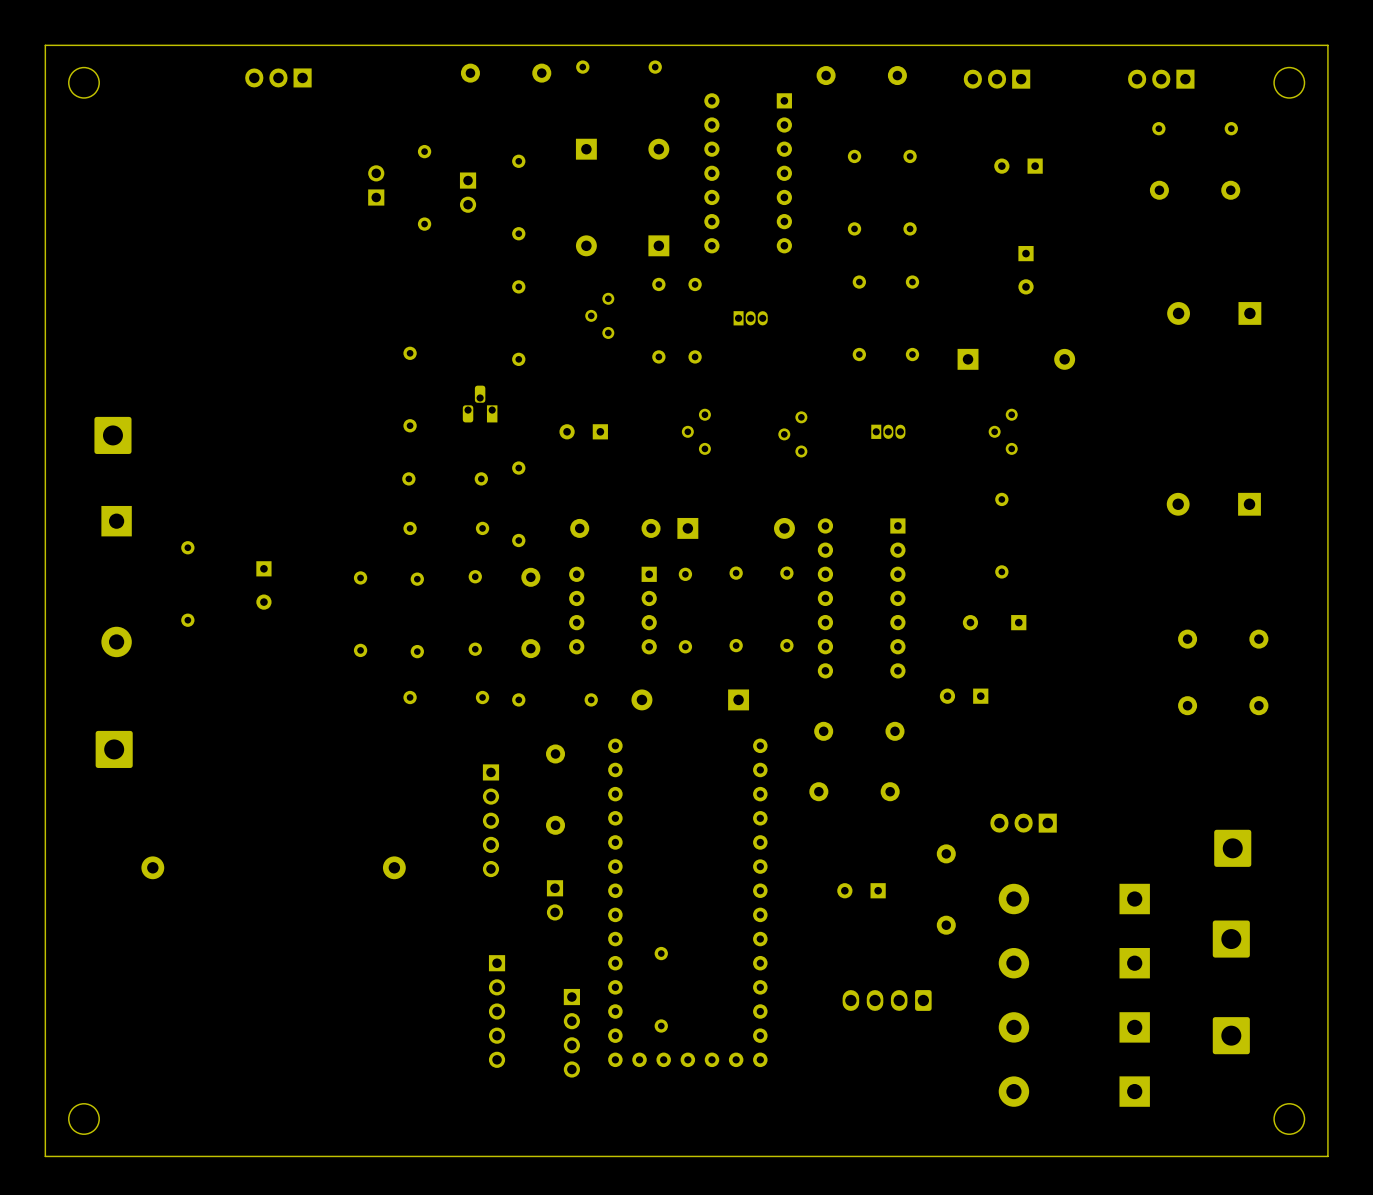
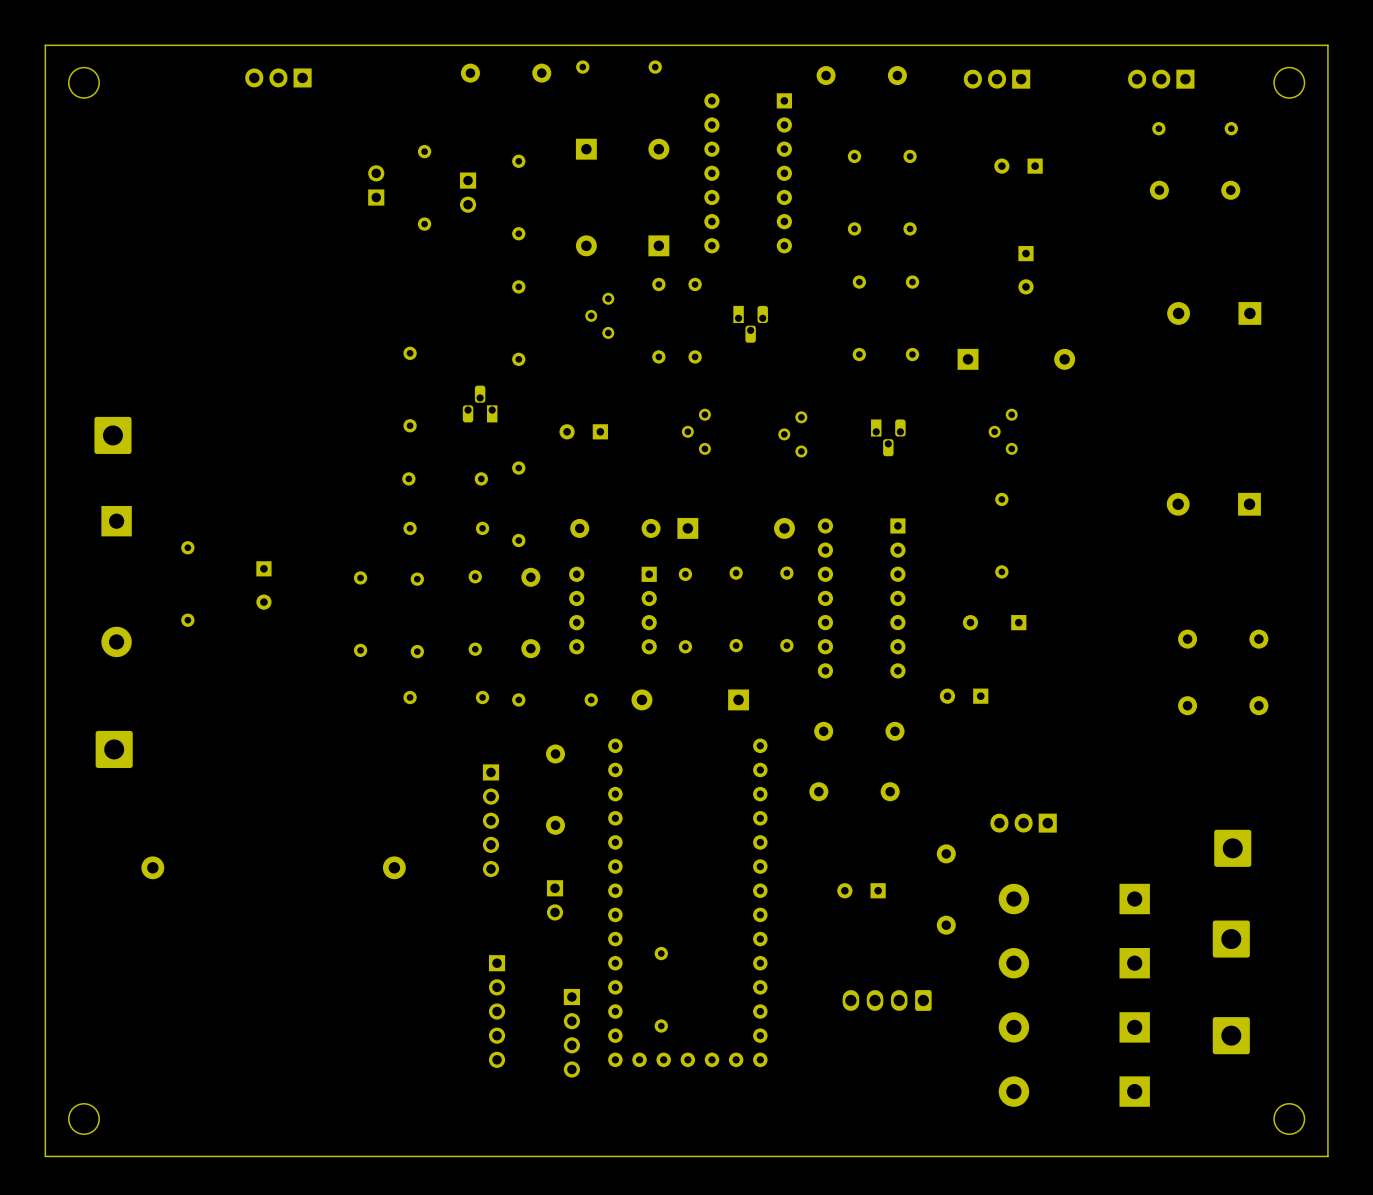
part footprint: [733, 311, 768, 326] -> [733, 305, 768, 343]
part footprint: [871, 424, 906, 439] -> [871, 419, 906, 457]

